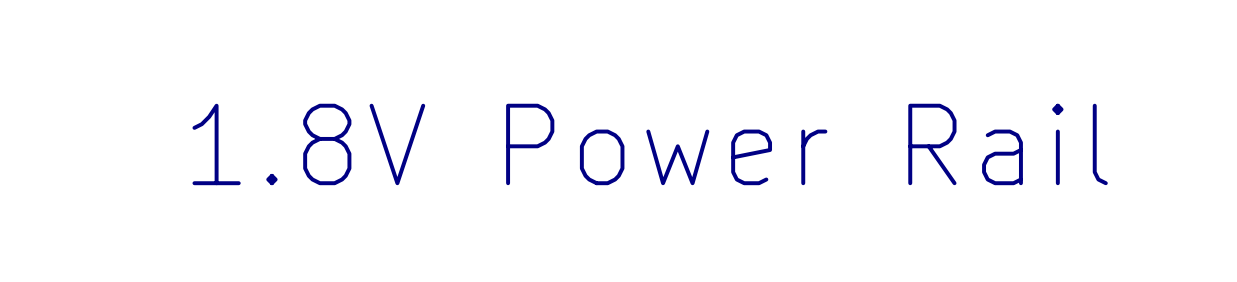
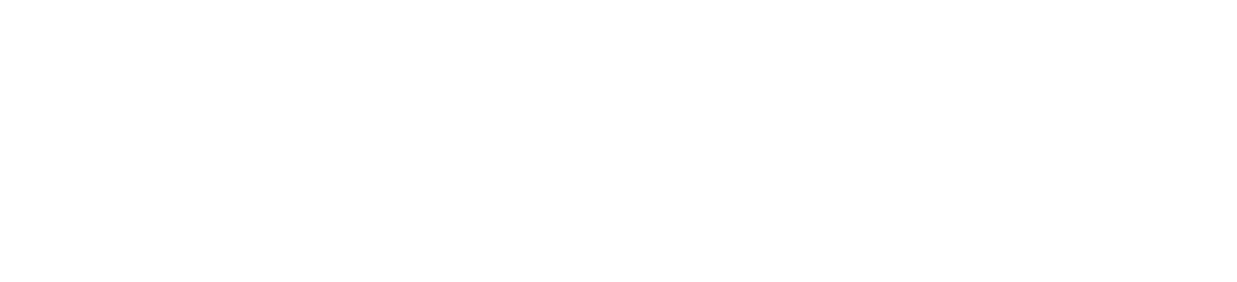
text: 1.8V Power Rail (650, 144) -> none

